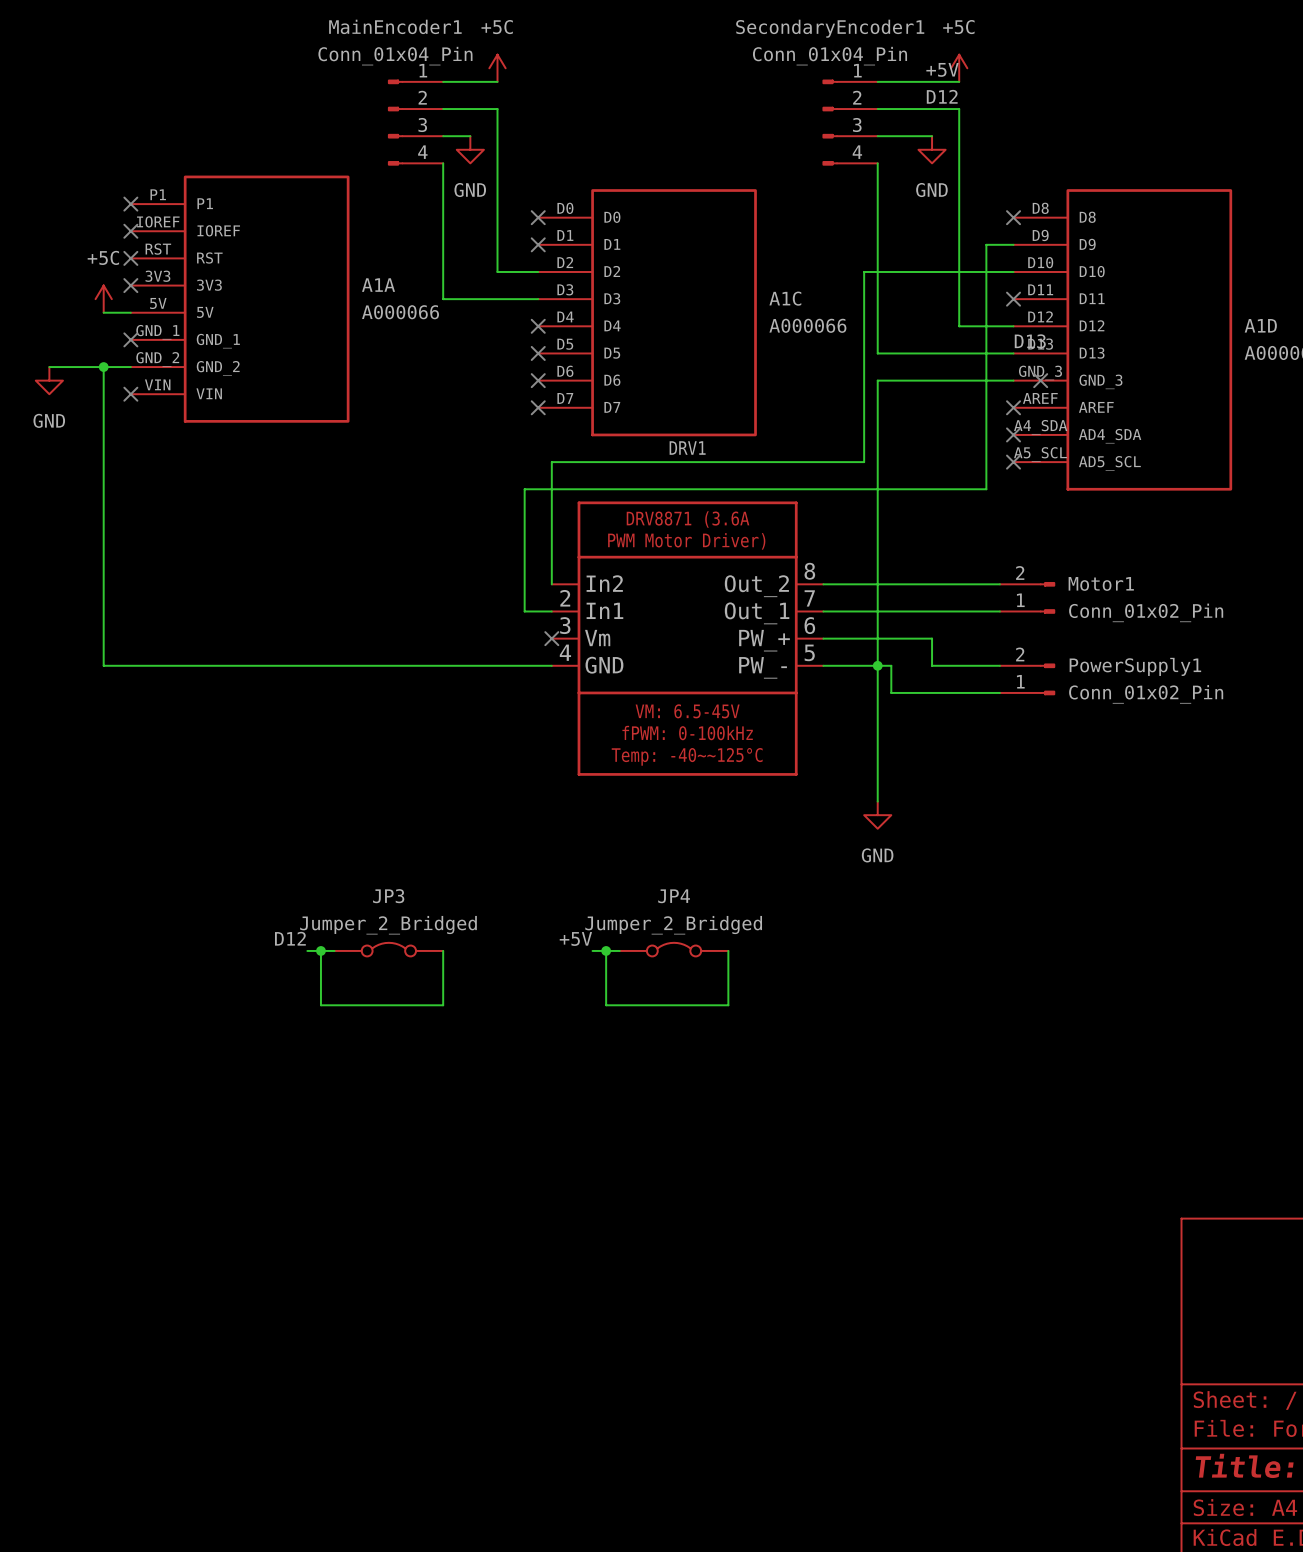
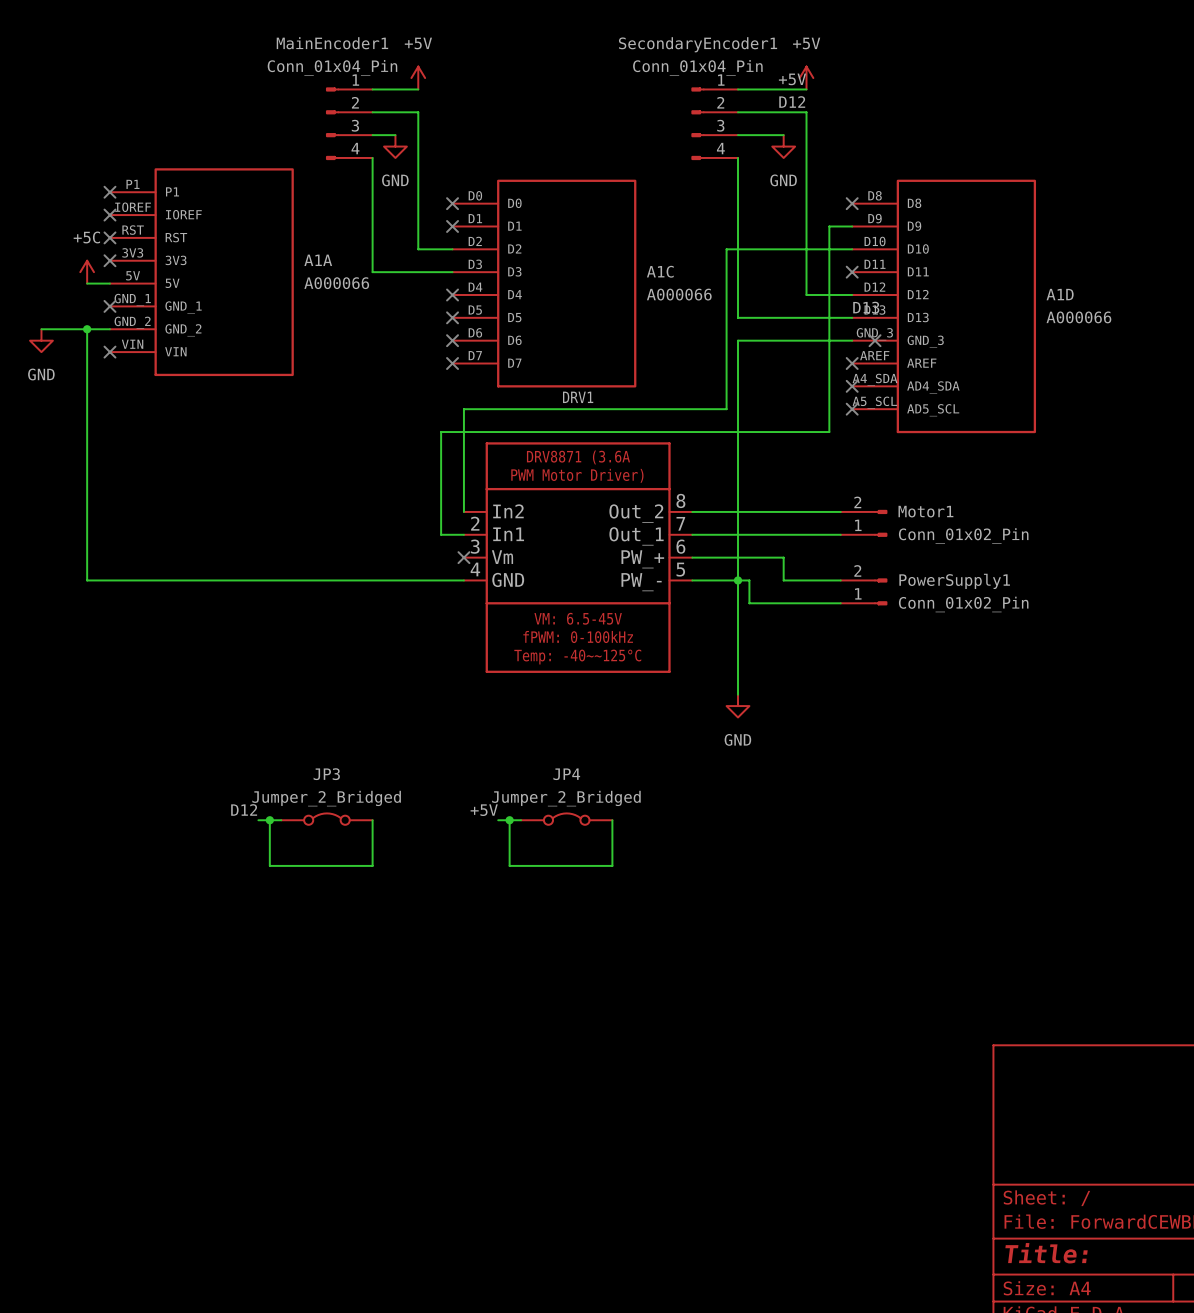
power symbol: +5C (497, 68) -> +5V (418, 78)
power symbol: +5C (959, 68) -> +5V (806, 78)

